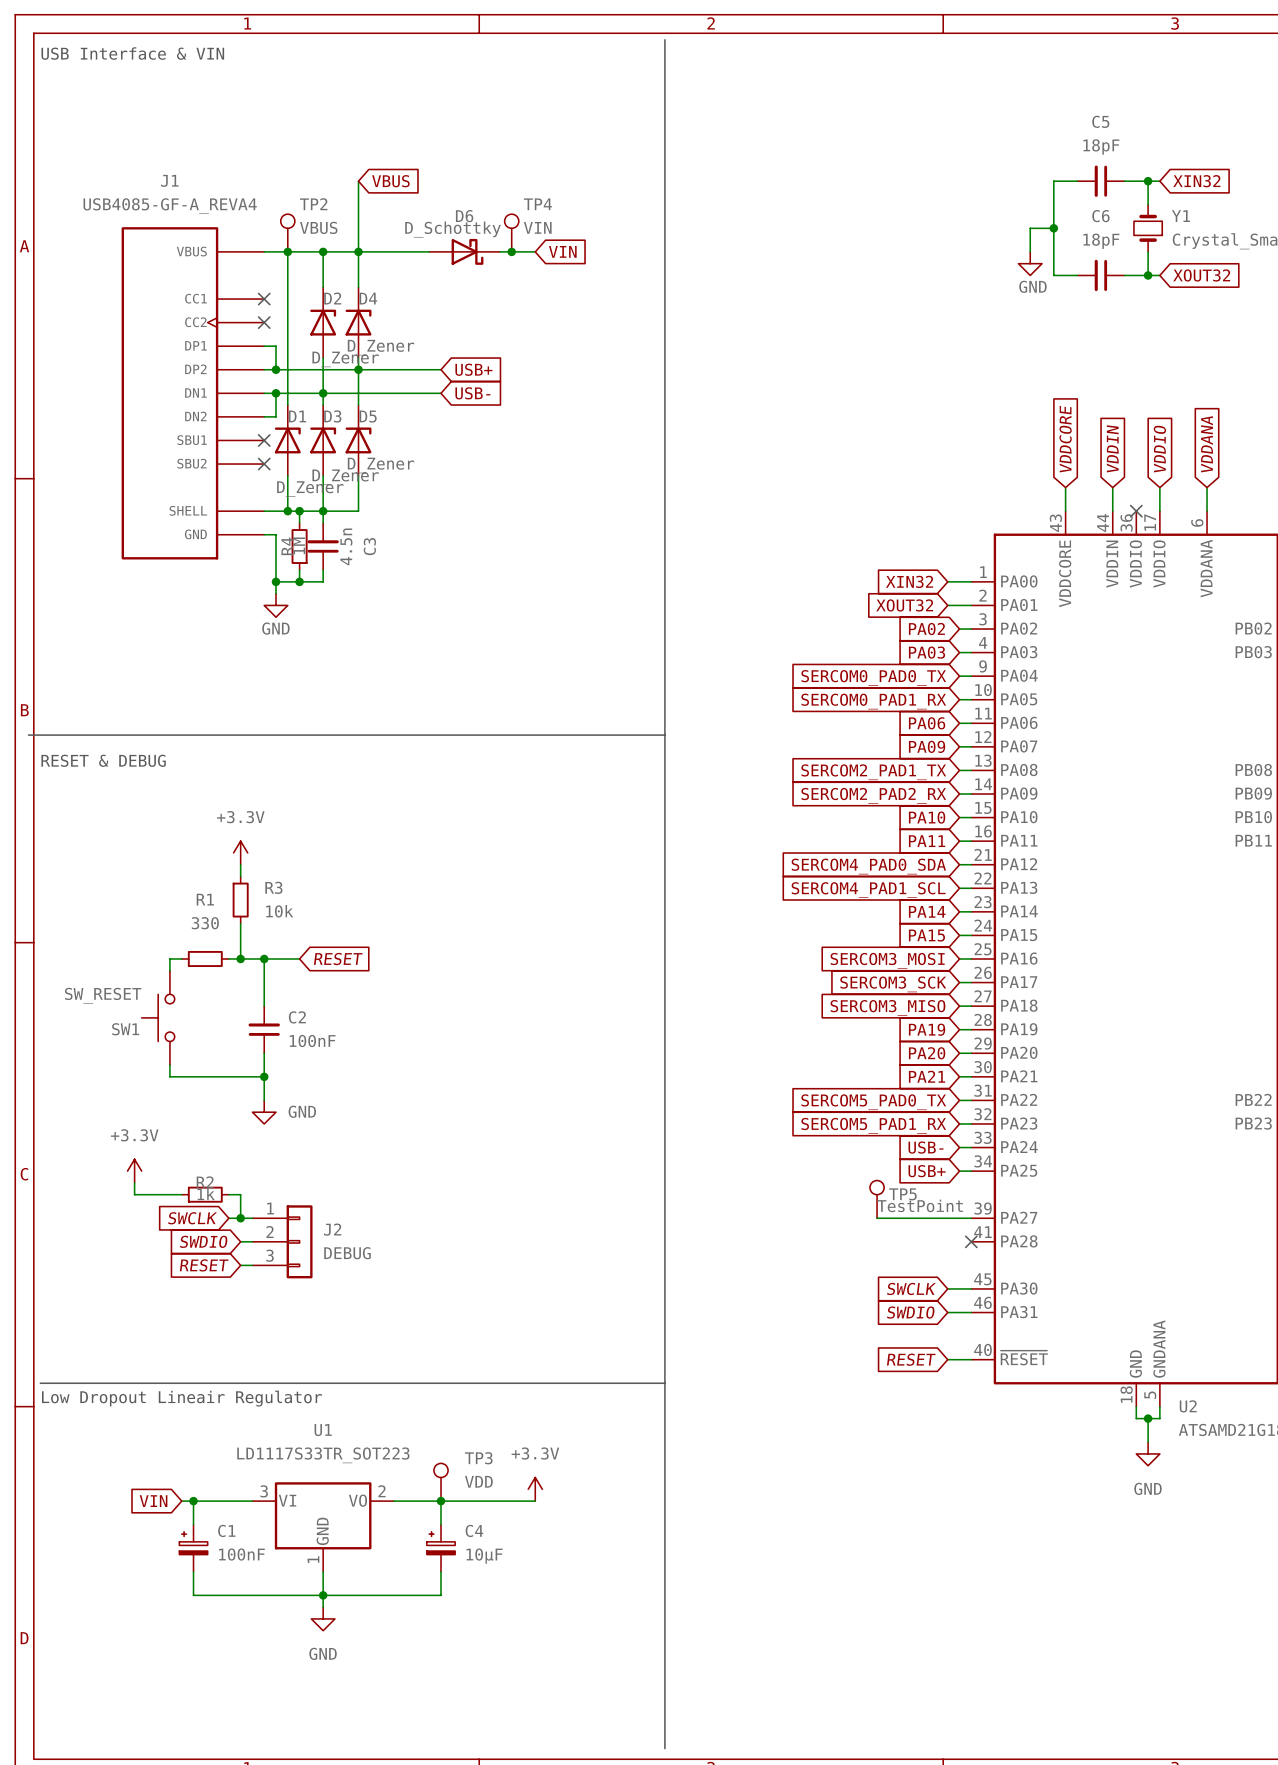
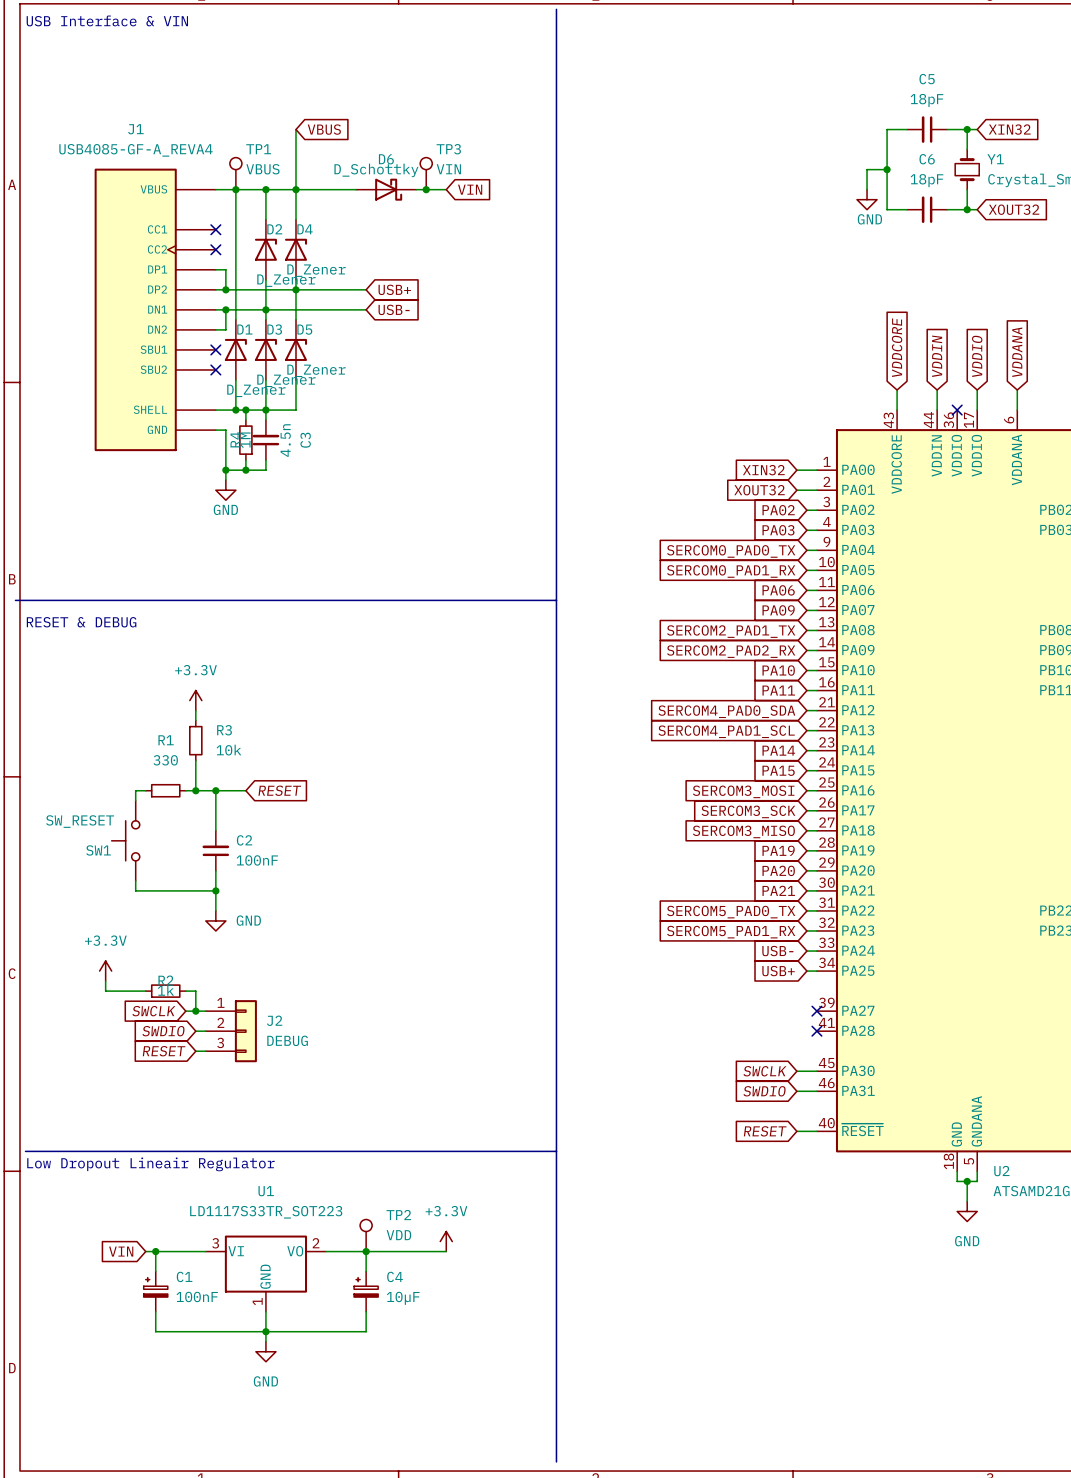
TP2 name: TP2 (313, 204) -> TP1 (258, 149)
TP4 name: TP4 (537, 204) -> TP3 (448, 149)
TP5: TestPoint (877, 1199) -> none
wire: (877, 1218) (971, 1218) -> none
no-connect mark: none -> (816, 1011)
TP3 name: TP3 (478, 1458) -> TP2 (398, 1215)

